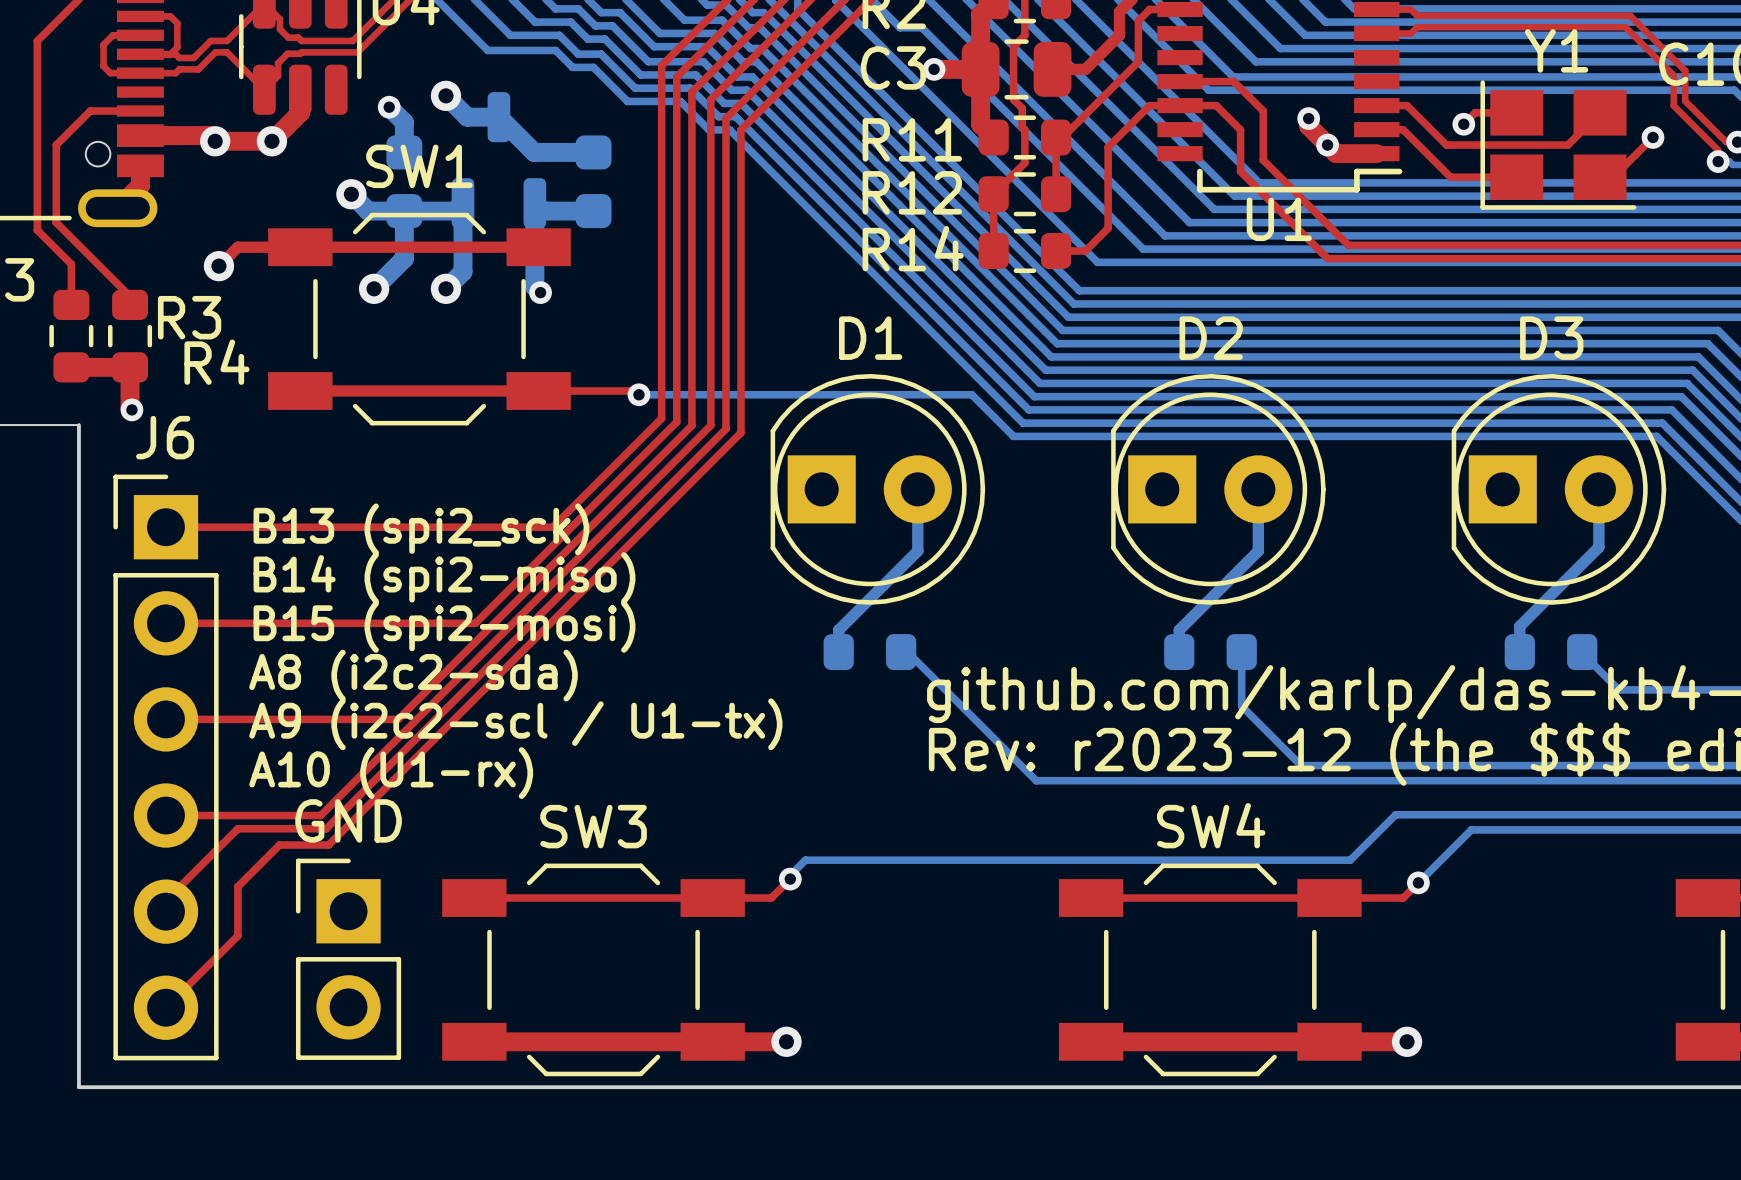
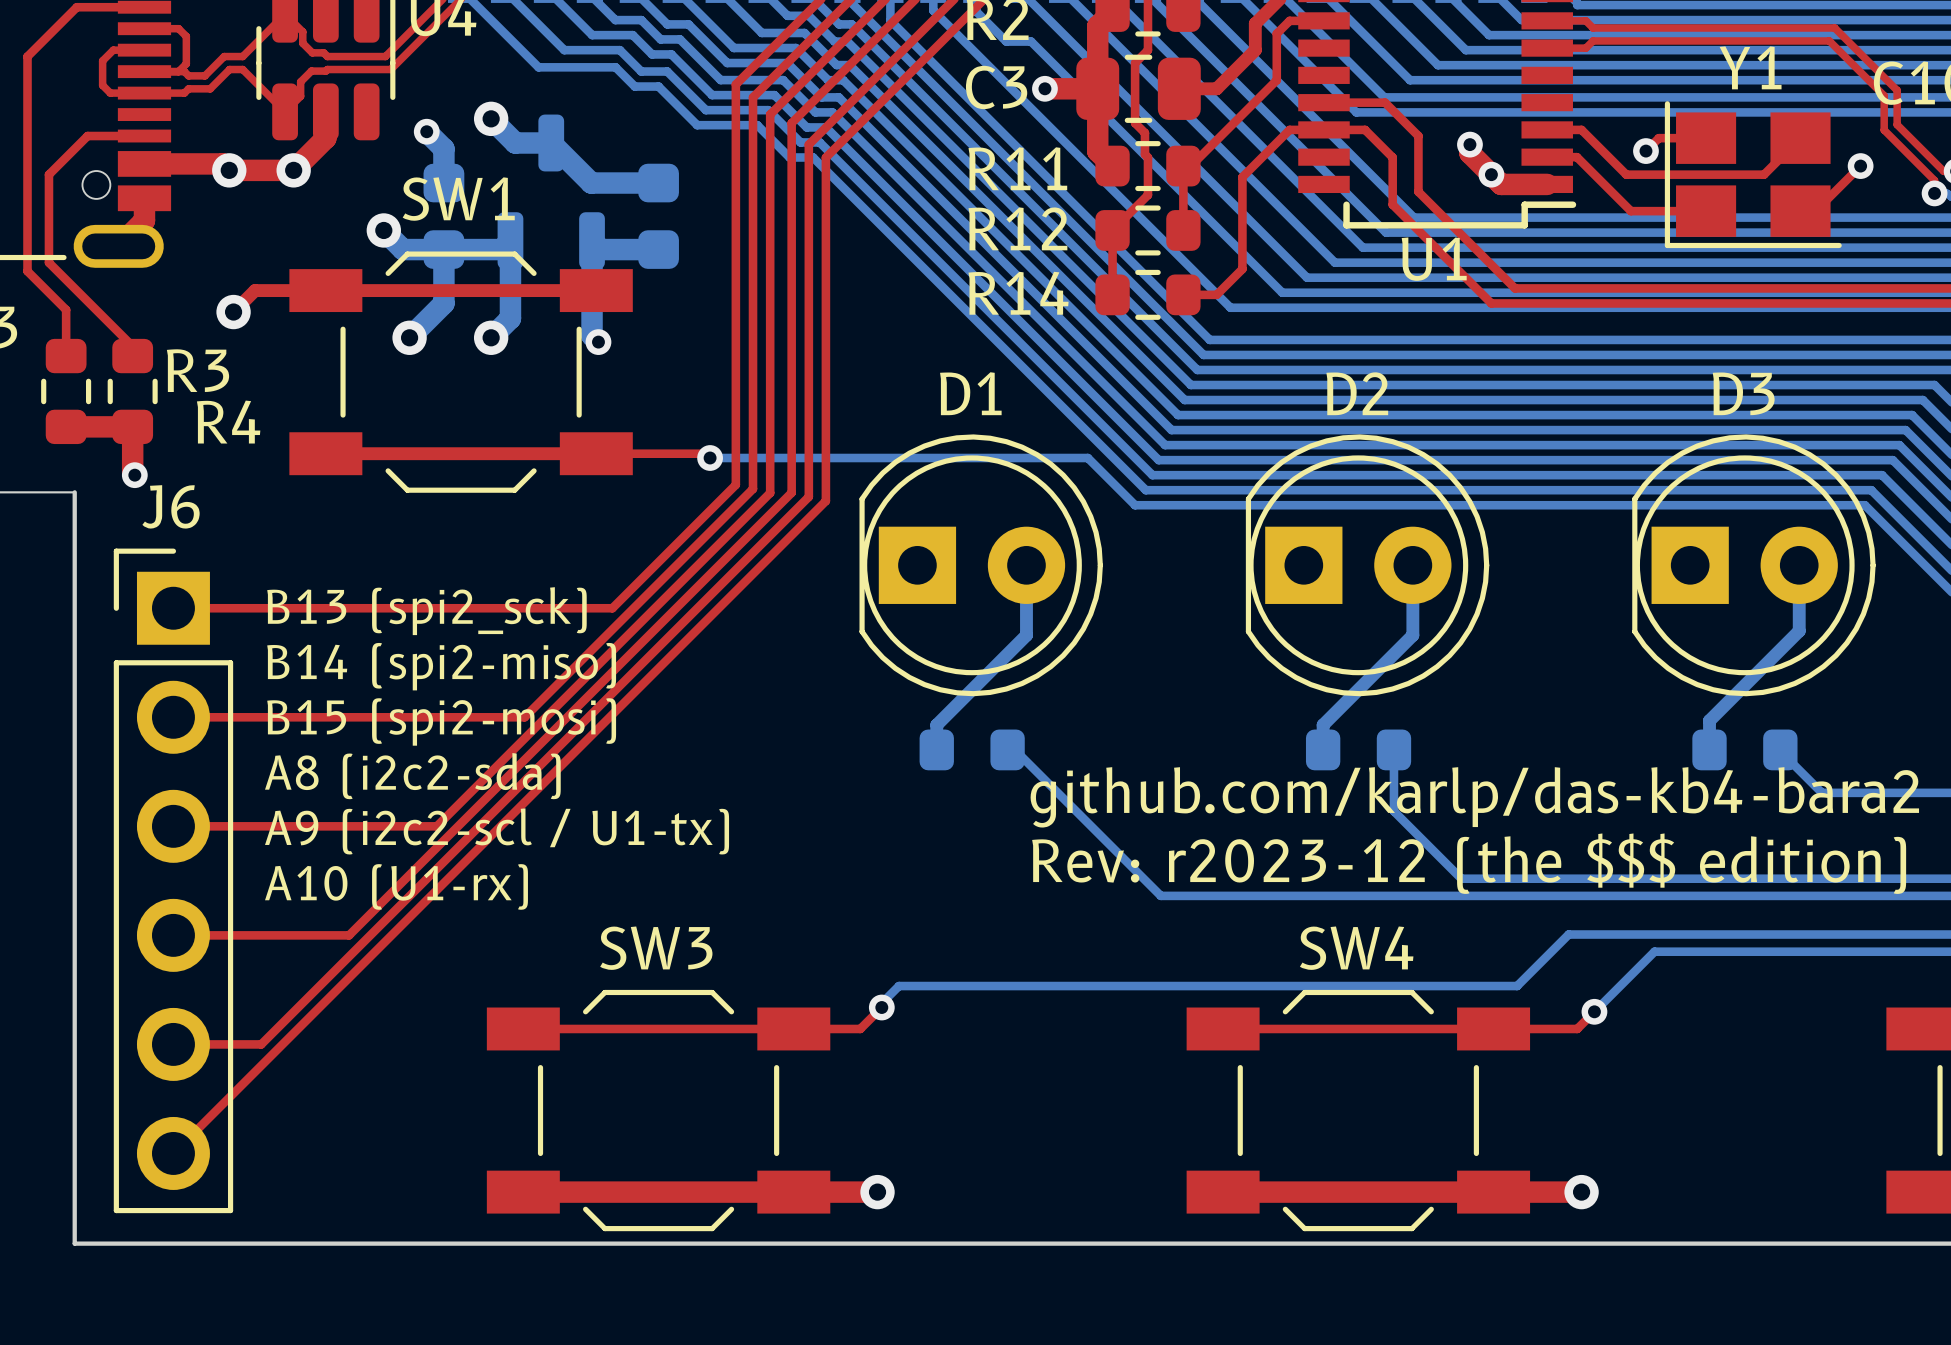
top track: (326, 828) (237, 828) (165, 900) (165, 911) -> (355, 950) (261, 1044) (173, 1044)
top track: (328, 845) (279, 845) (237, 886) (237, 935) -> (358, 968) (255, 1071)
part: GND (348, 959) -> none

